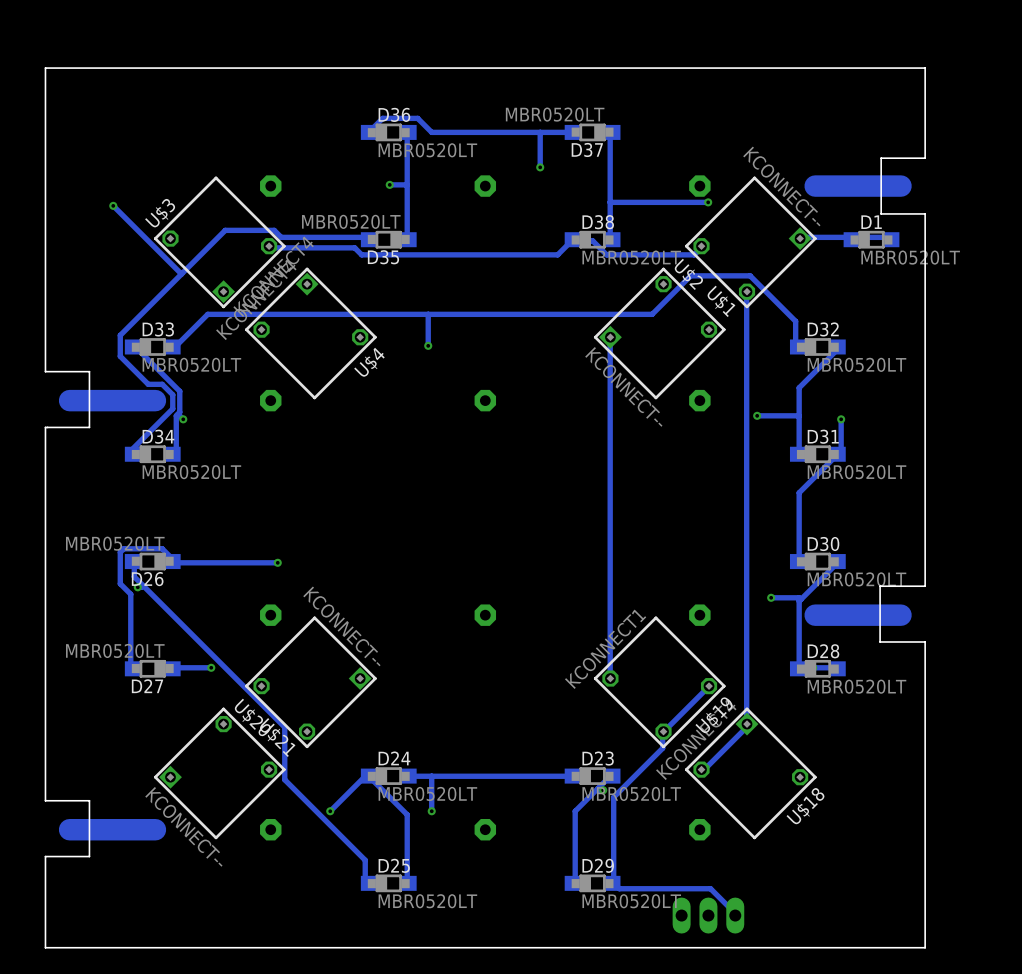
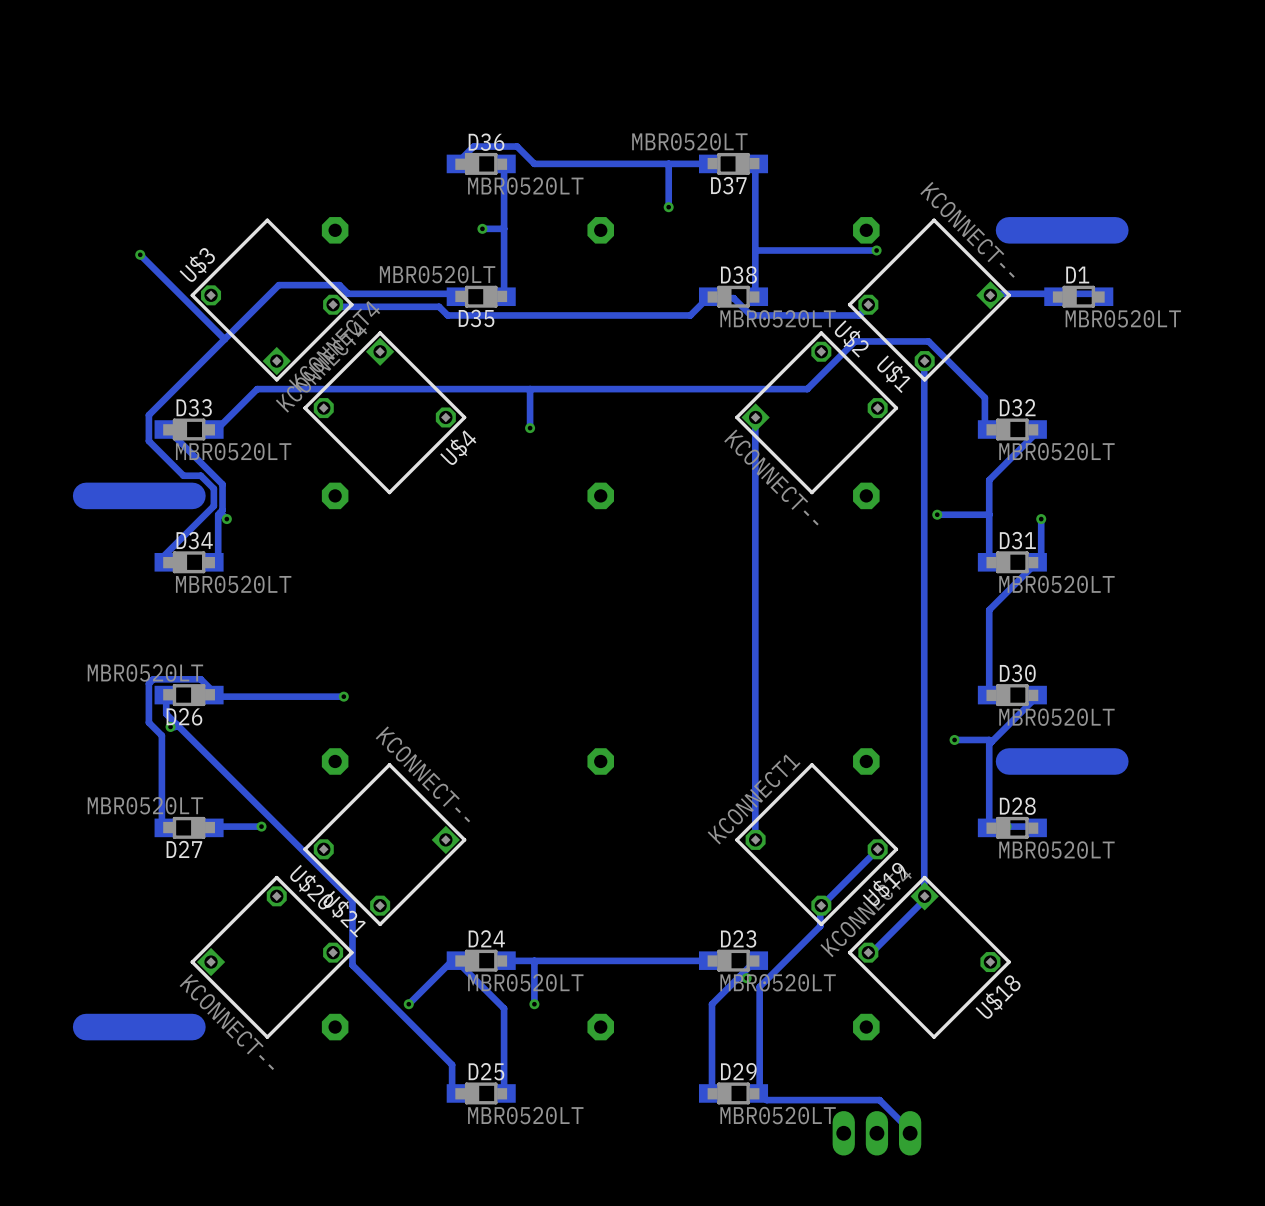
board edge: (925, 68) (925, 158) (881, 158) (881, 213) (925, 213) (925, 586) (880, 586) (880, 641) (925, 641) (925, 947) (45, 947) (45, 856) (89, 856) (89, 800) (45, 800) (45, 427) (89, 427) (89, 371) (45, 371) (45, 68) (925, 68) -> none

